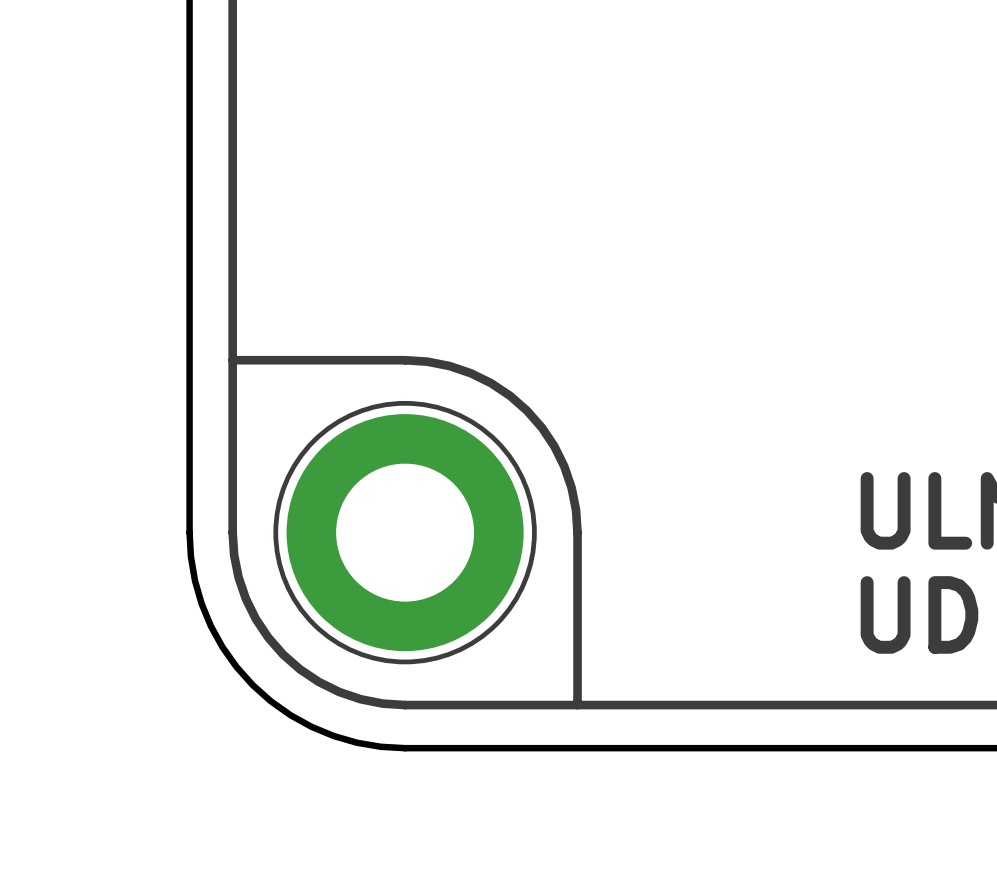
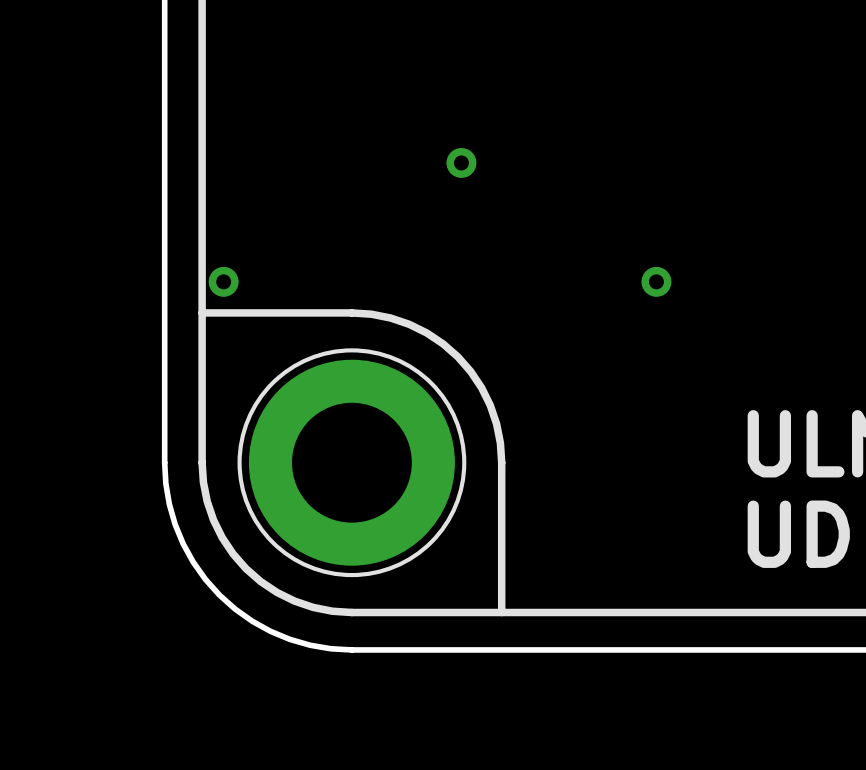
via: none -> (461, 162)
via: none -> (223, 281)
via: none -> (656, 281)

